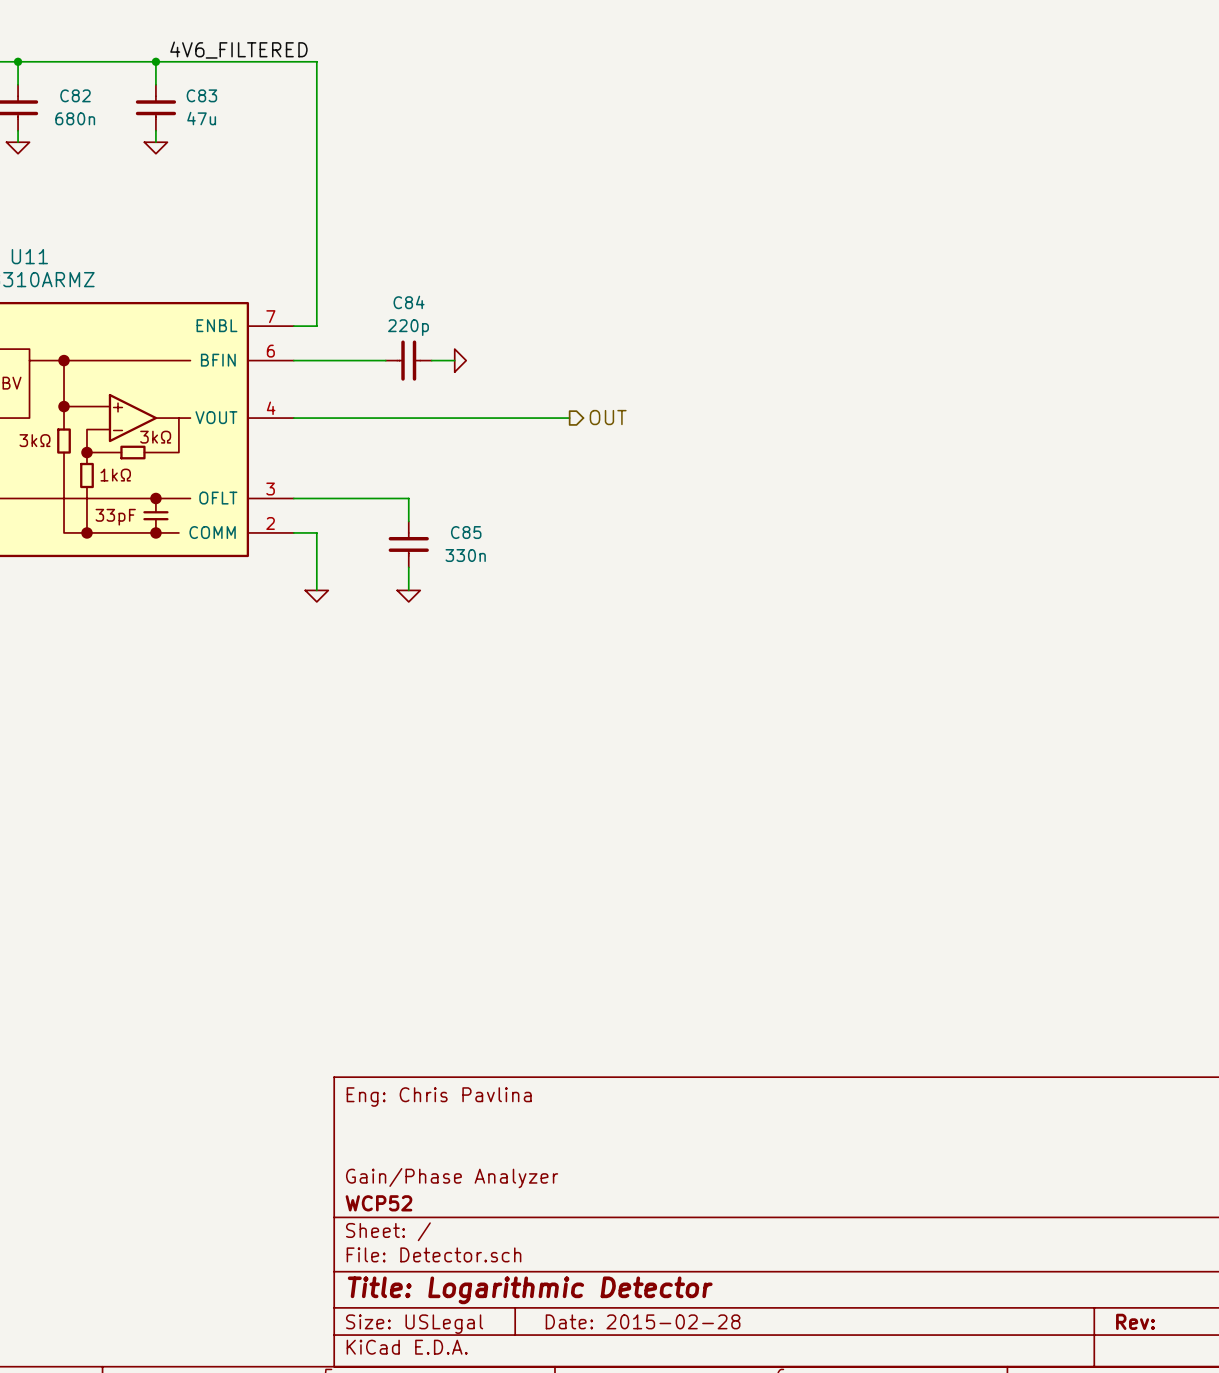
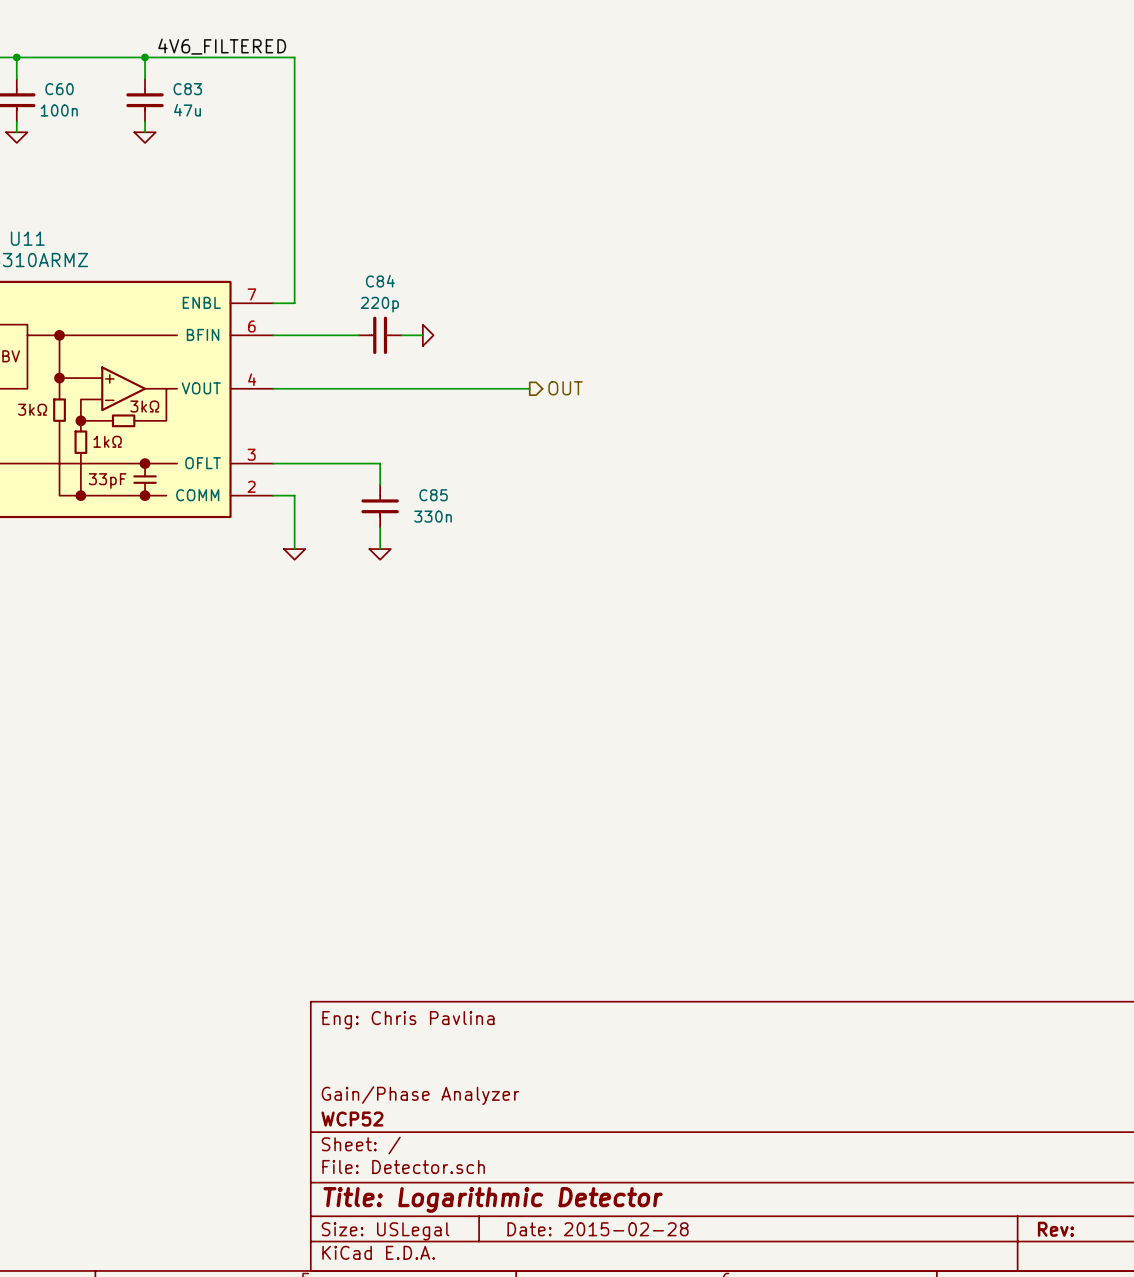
C82 name: C82 (75, 95) -> C60 (59, 89)
C82 value: 680n (75, 118) -> 100n (59, 110)

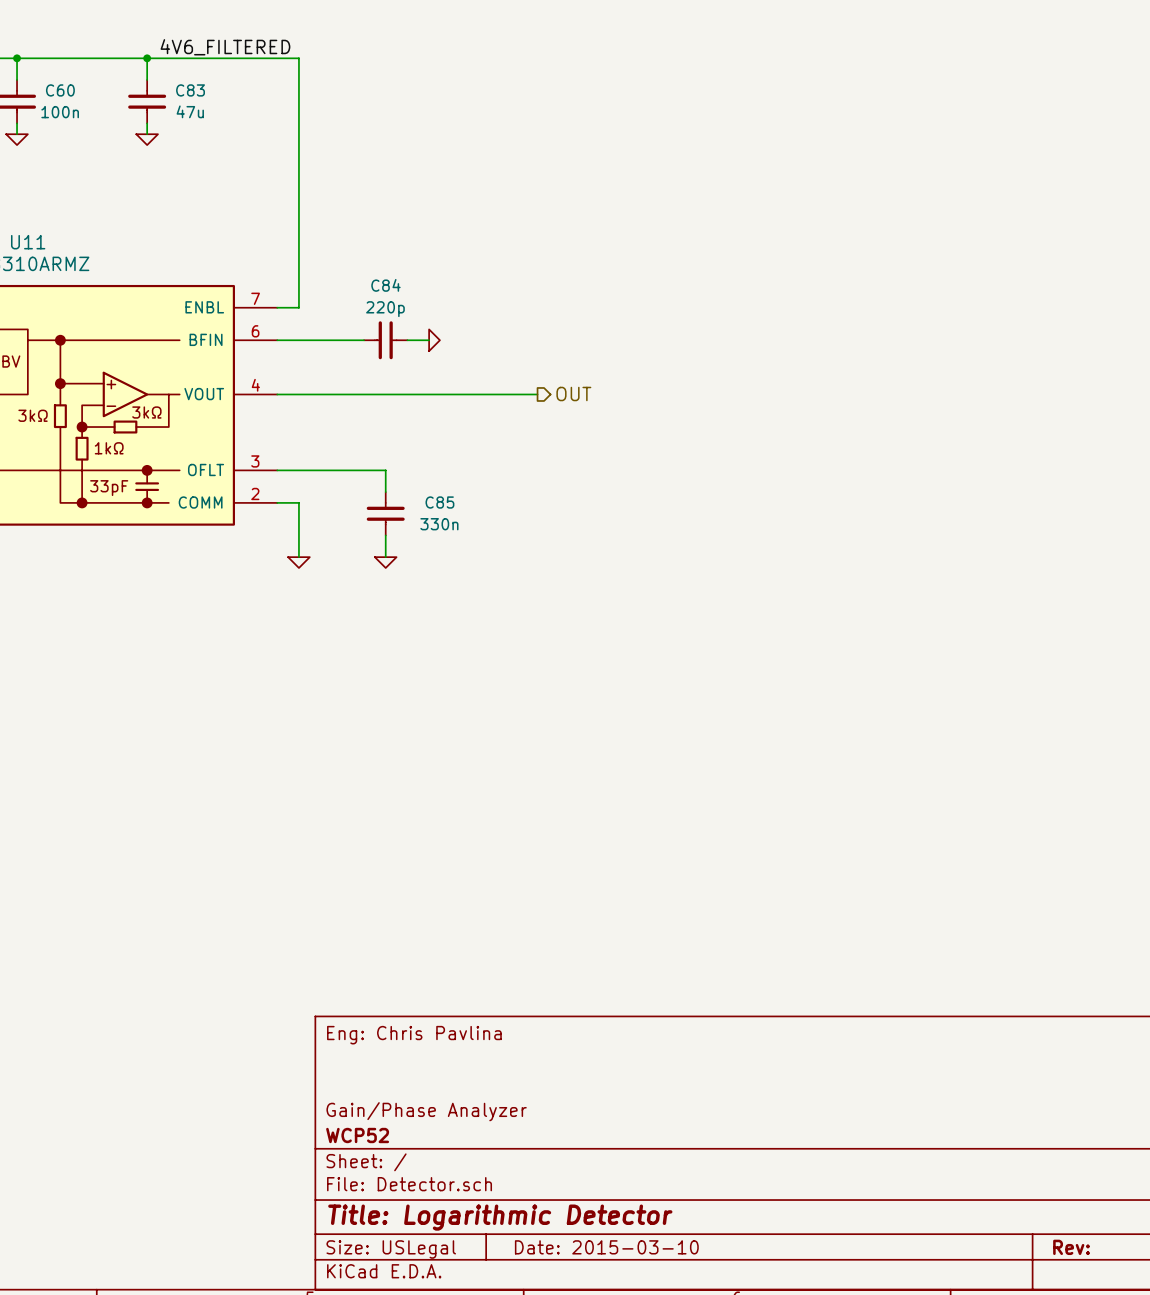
title block: Date: 2015-02-28 (598, 1229) -> Date: 2015-03-10 (606, 1247)

